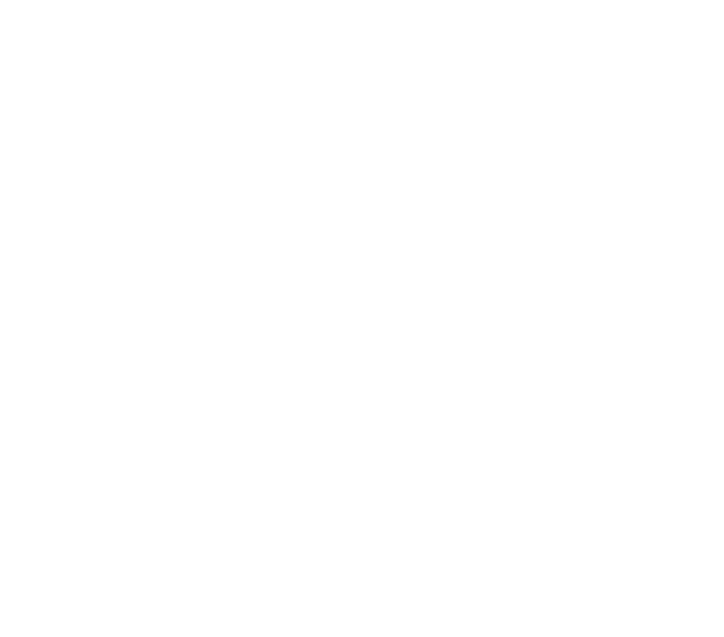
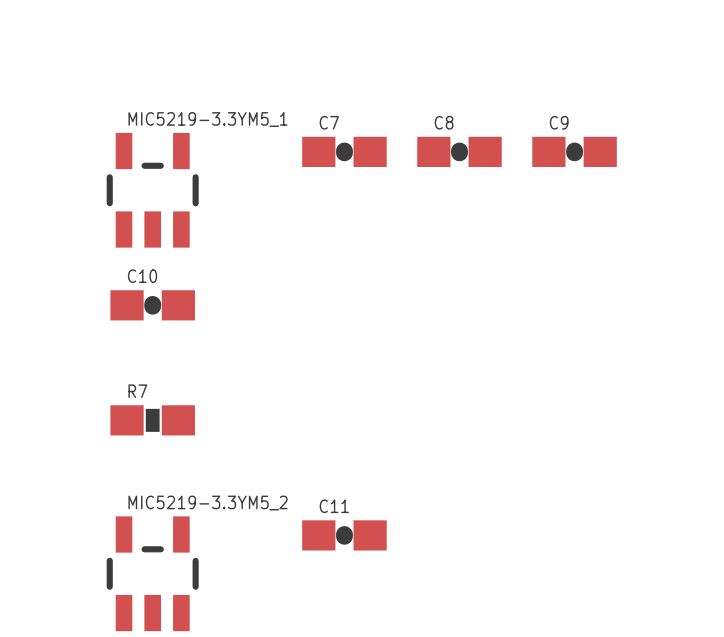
C7: none -> (344, 151)
C8: none -> (459, 151)
C9: none -> (574, 151)
MIC5219-3.3YM5_1: none -> (152, 190)
C10: none -> (152, 305)
R7: none -> (152, 420)
C11: none -> (344, 535)
MIC5219-3.3YM5_2: none -> (152, 573)

